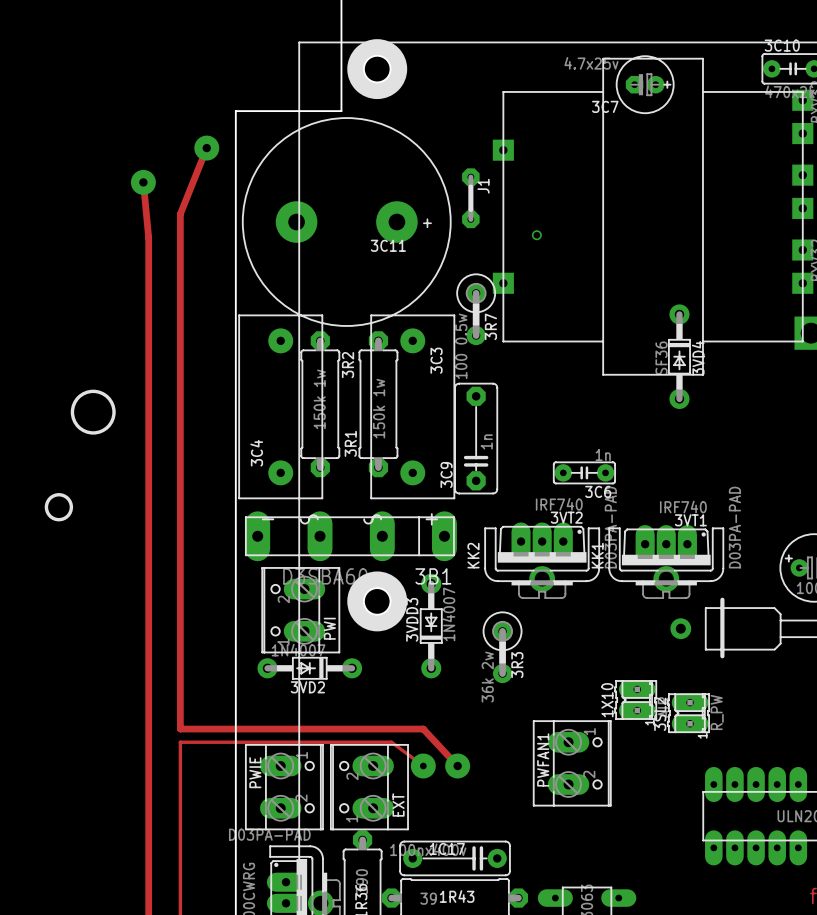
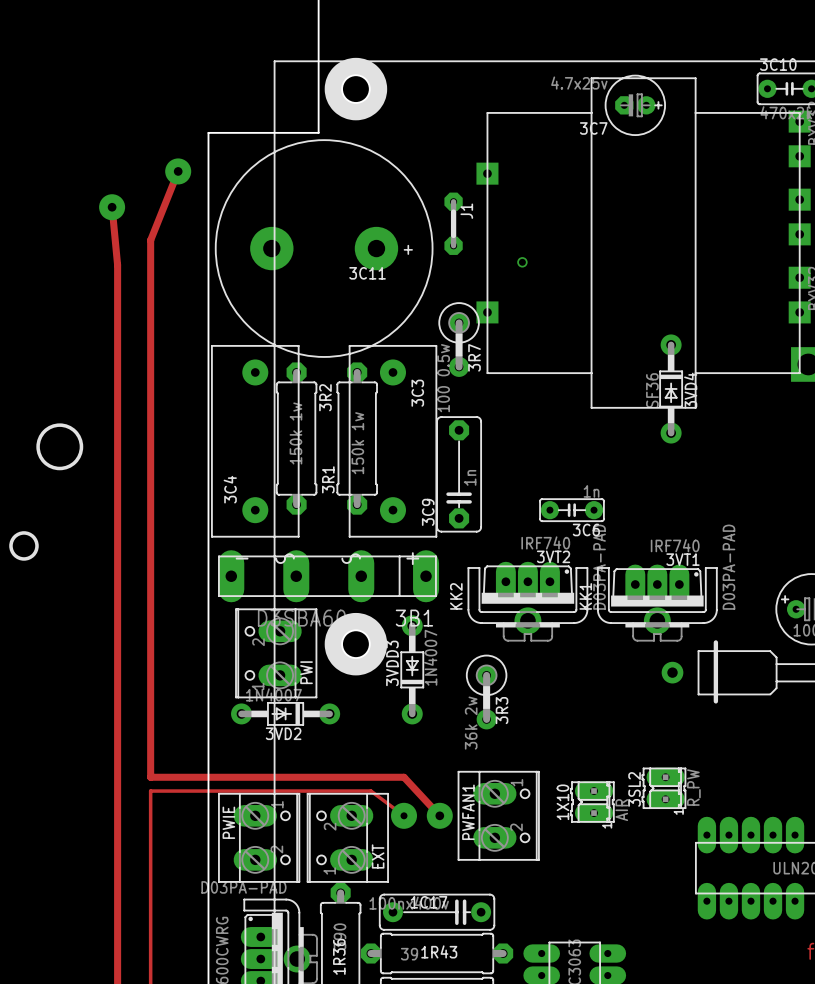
1X10 position: (635, 699) -> (592, 802)
3SL2 position: (688, 713) -> (663, 788)
PWFAN1 position: (572, 763) -> (498, 815)

